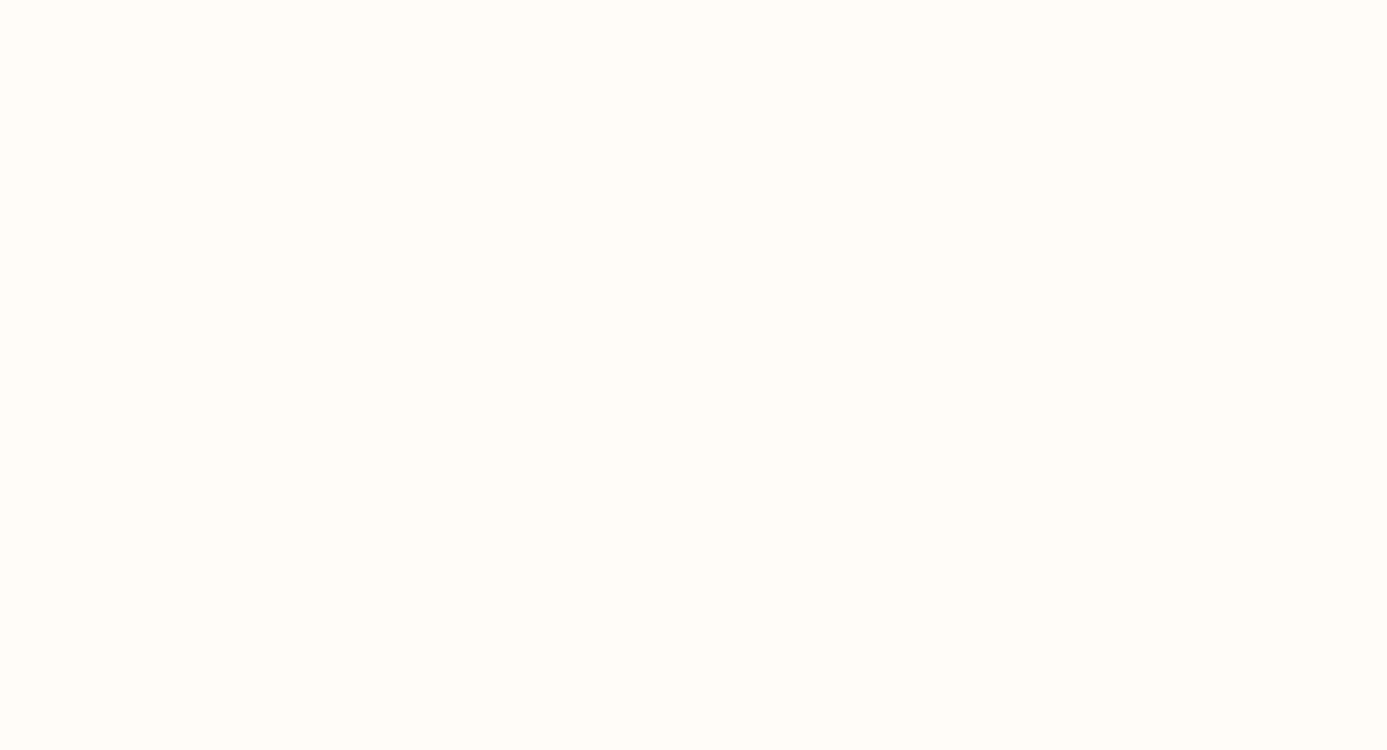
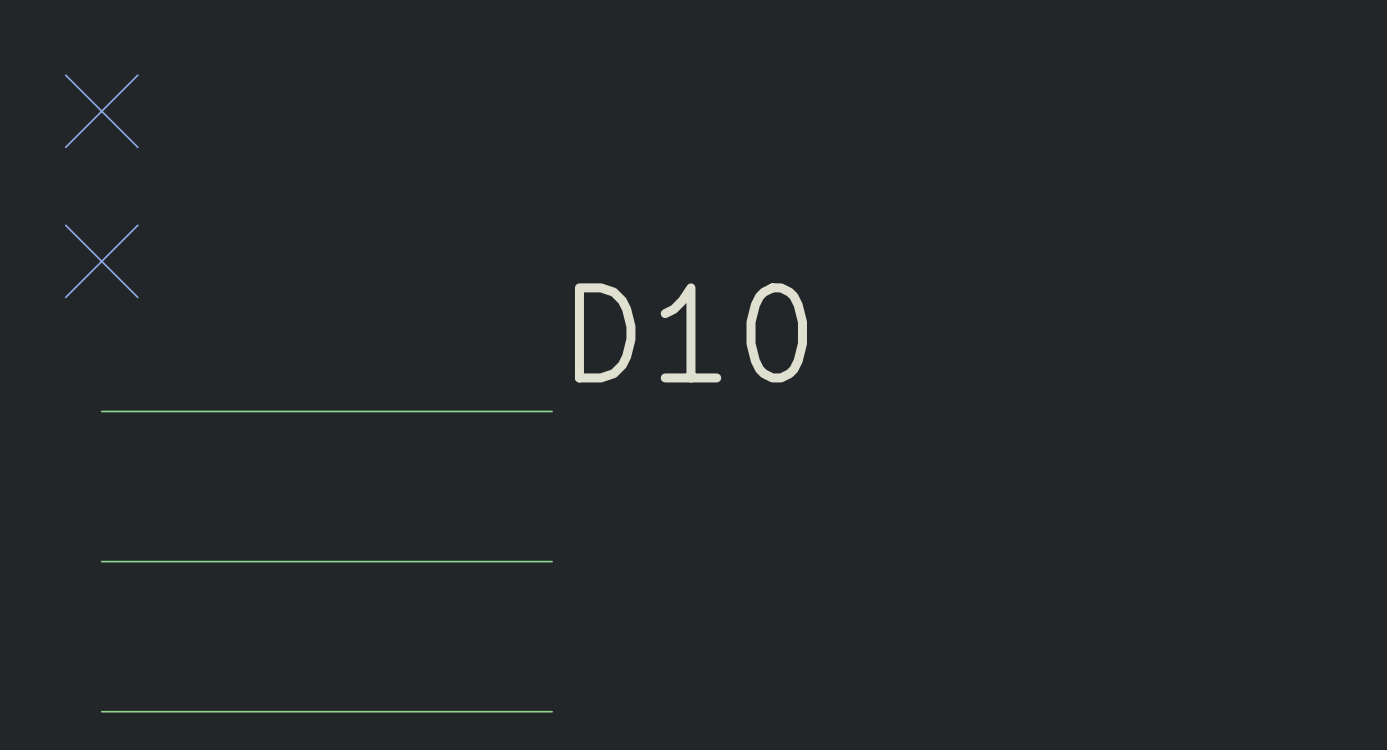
no-connect mark: none -> (101, 111)
no-connect mark: none -> (101, 261)
label: none -> D10 (690, 332)
wire: none -> (101, 411) (552, 411)
wire: none -> (101, 561) (552, 561)
wire: none -> (101, 711) (552, 711)

